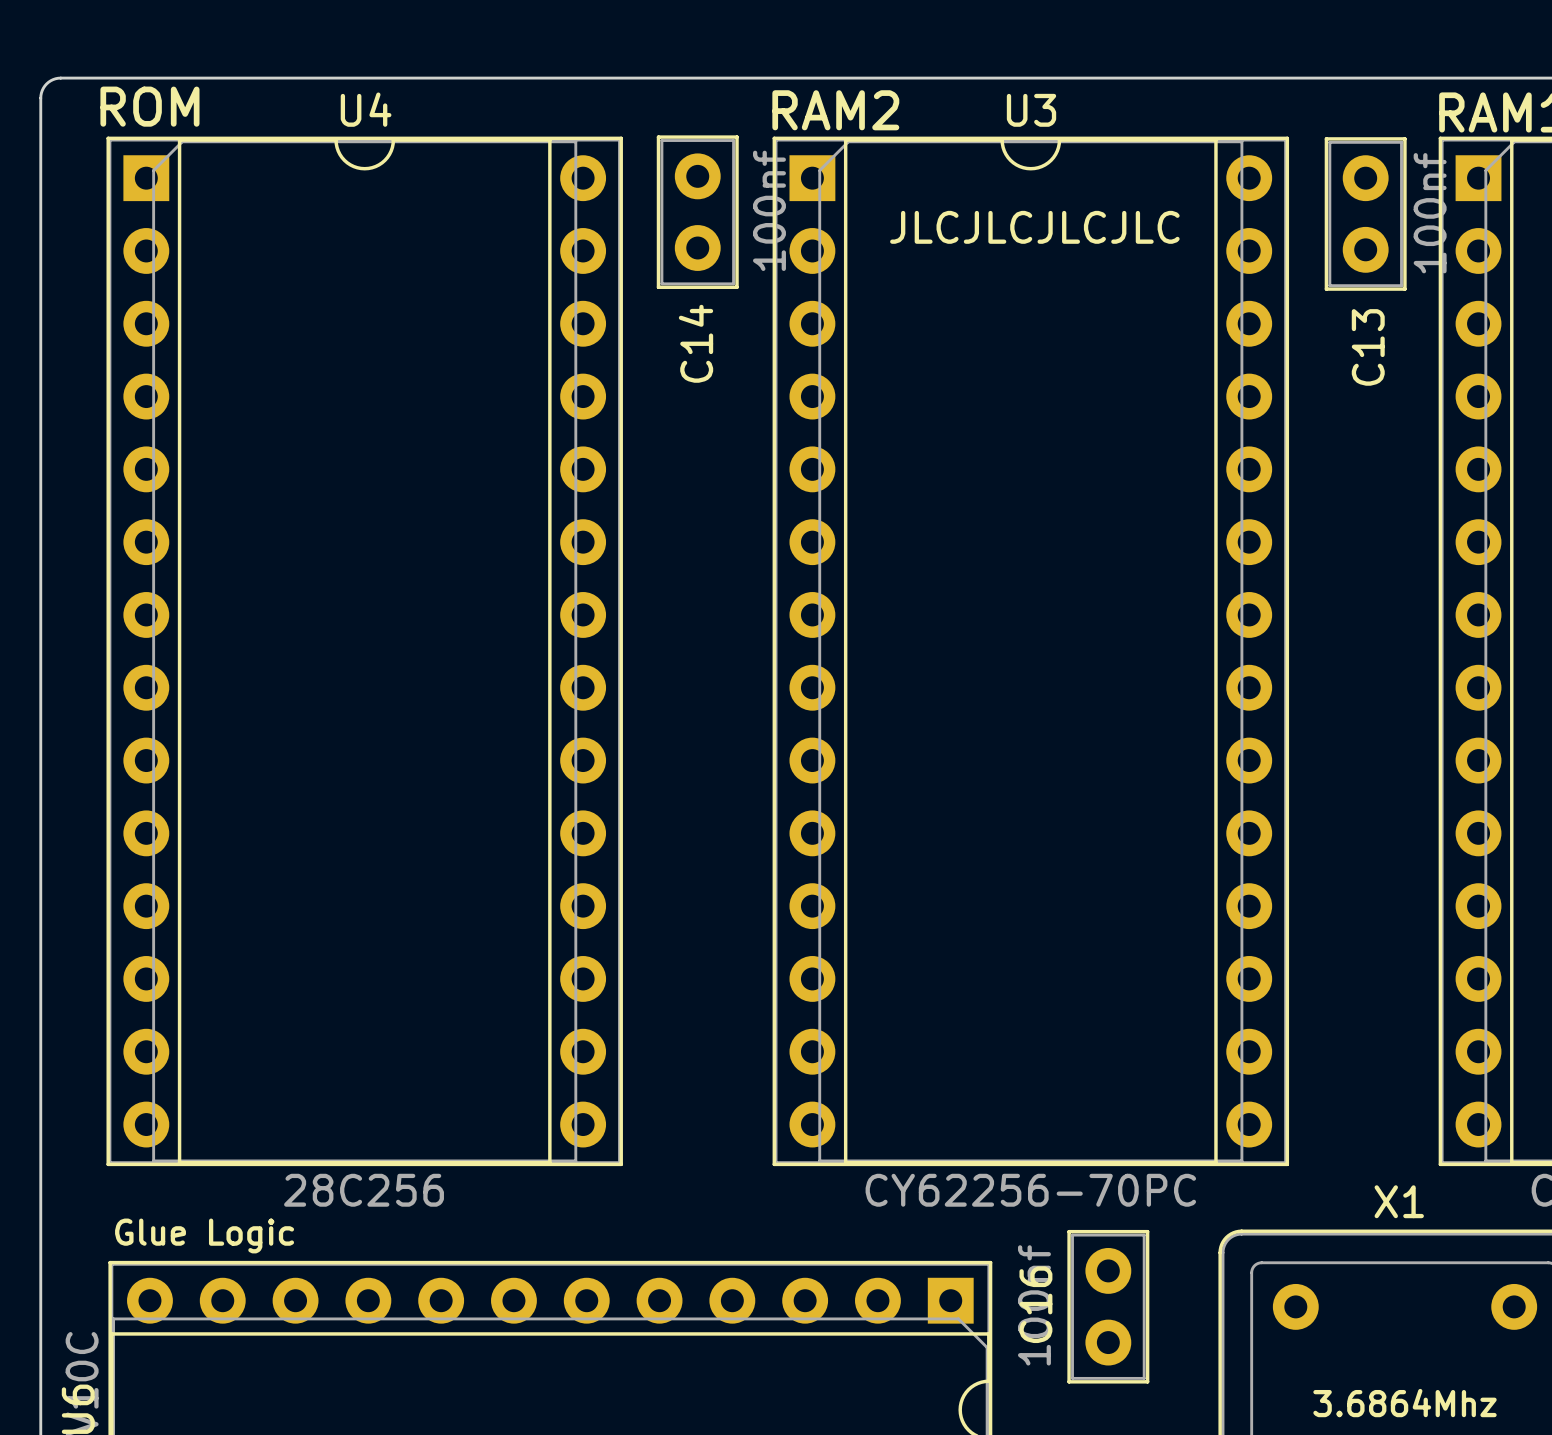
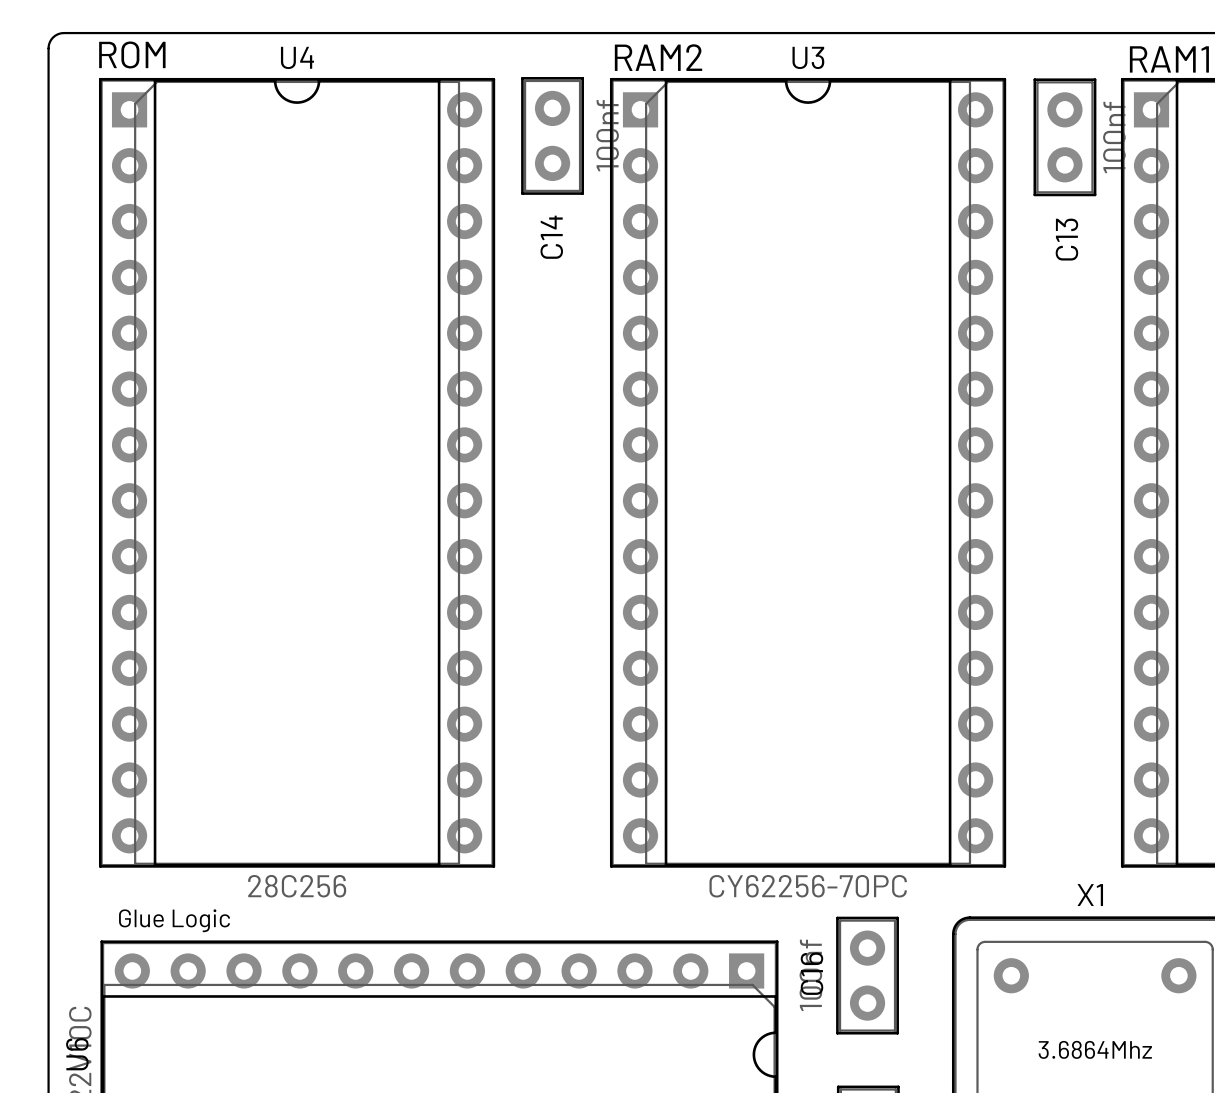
text: JLCJLCJLCJLC (1034, 227) -> none

